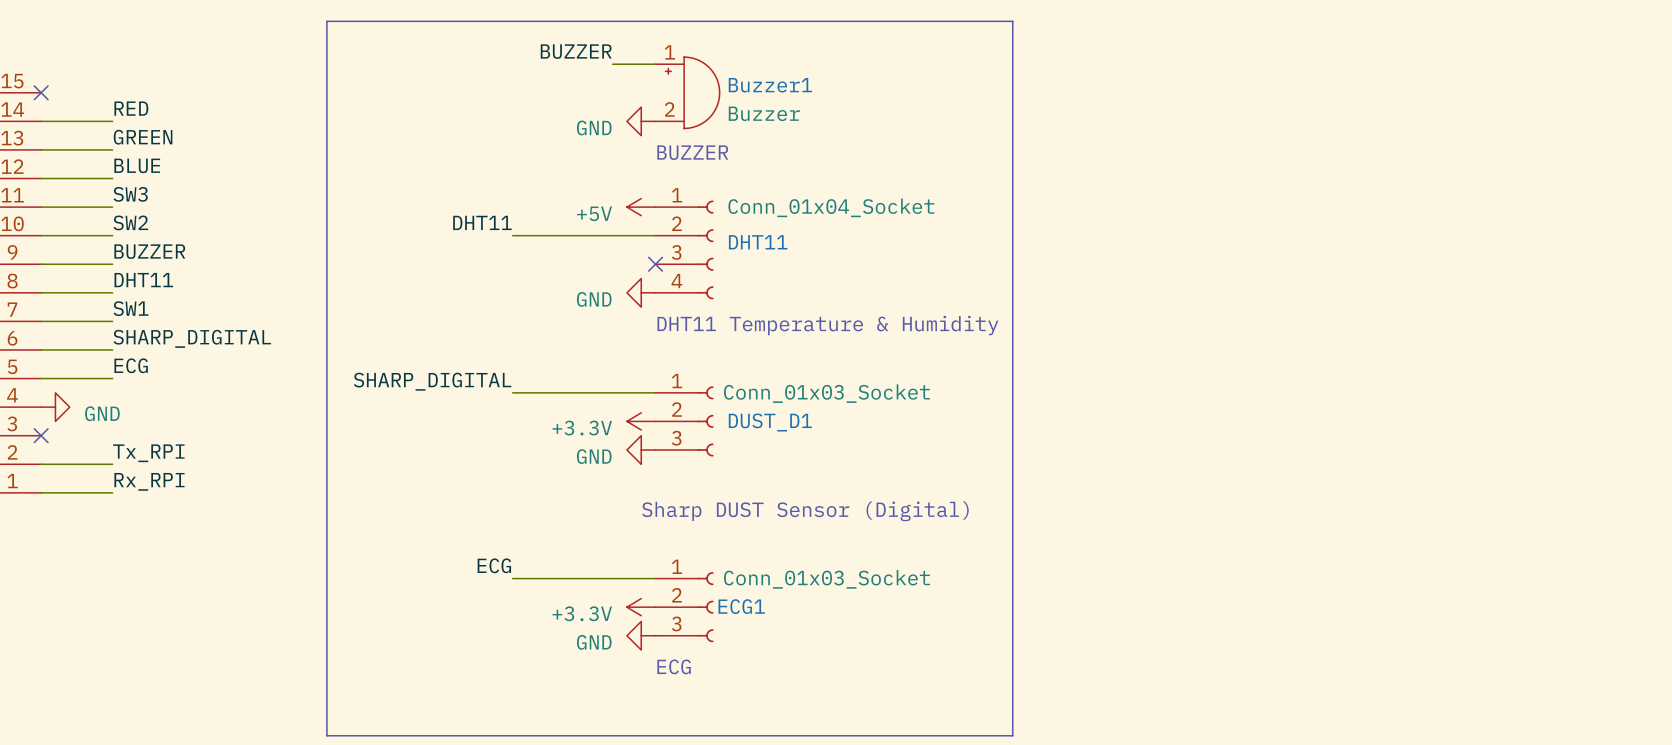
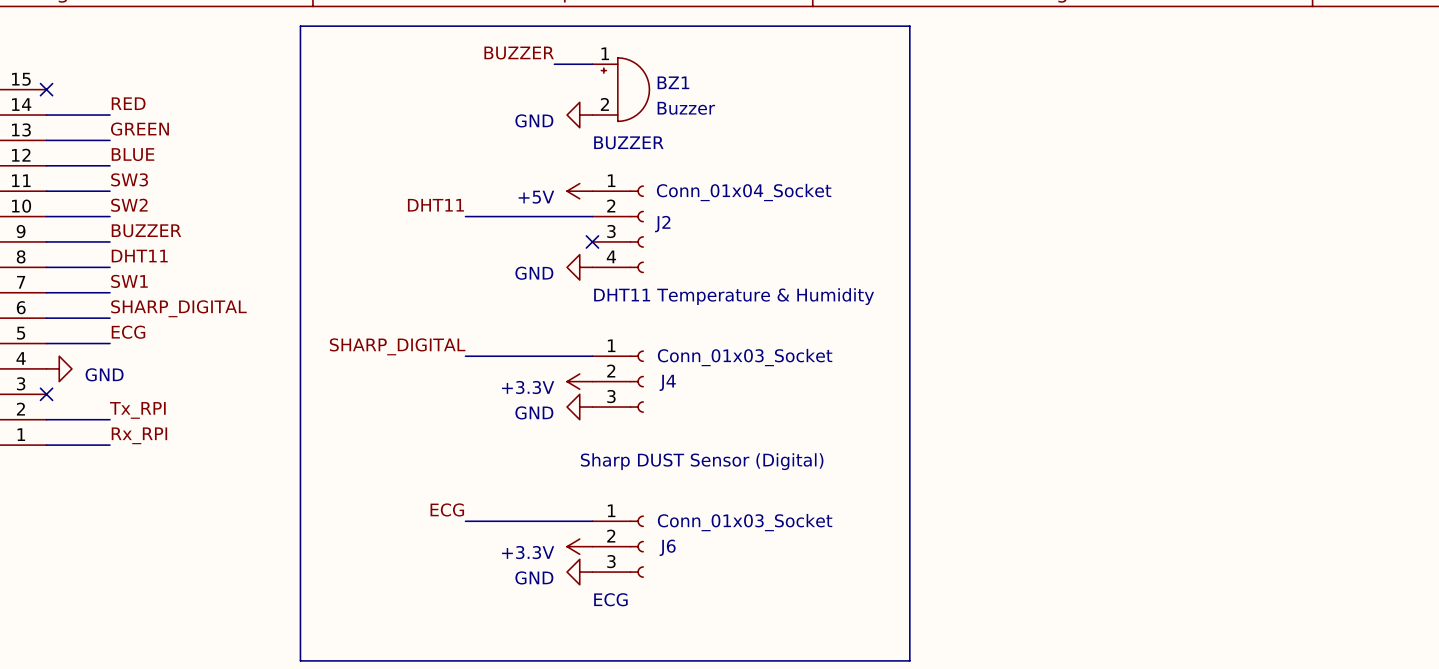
Buzzer1 name: Buzzer1 (770, 85) -> BZ1 (673, 82)
DHT11 name: DHT11 (758, 242) -> J2 (662, 224)
DUST_D1 name: DUST_D1 (770, 422) -> J4 (667, 382)
ECG1 name: ECG1 (741, 606) -> J6 (667, 547)

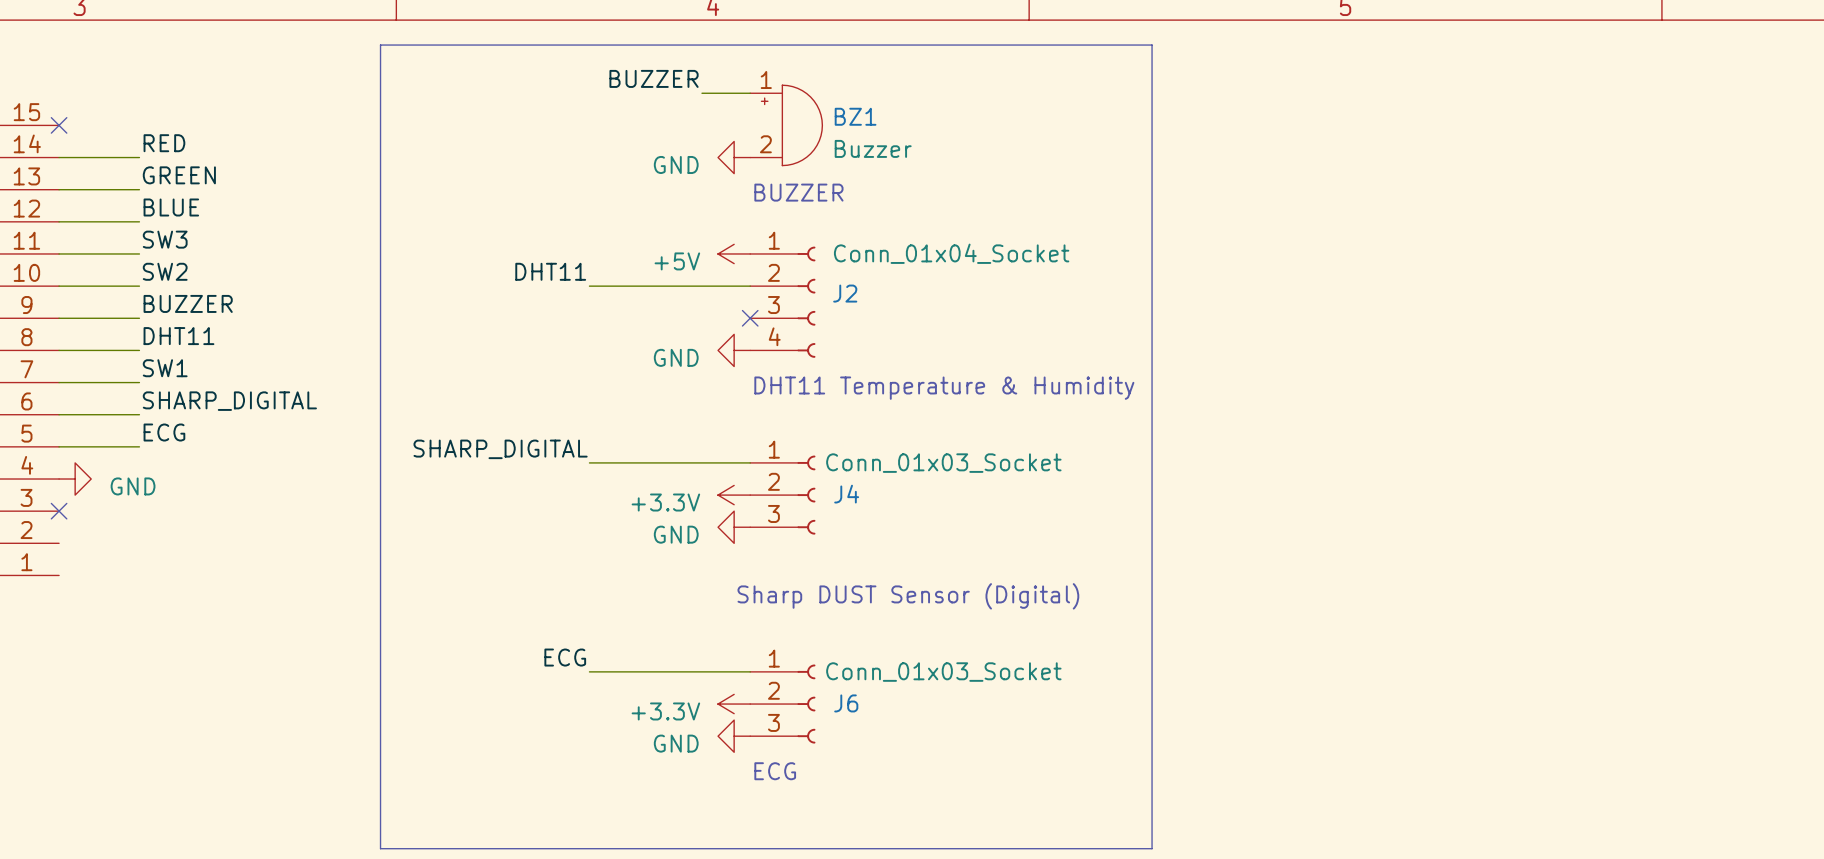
label: Tx_RPI (137, 410) -> none
wire: (46, 419) (110, 419) -> none
label: Rx_RPI (139, 435) -> none
wire: (46, 445) (110, 445) -> none

